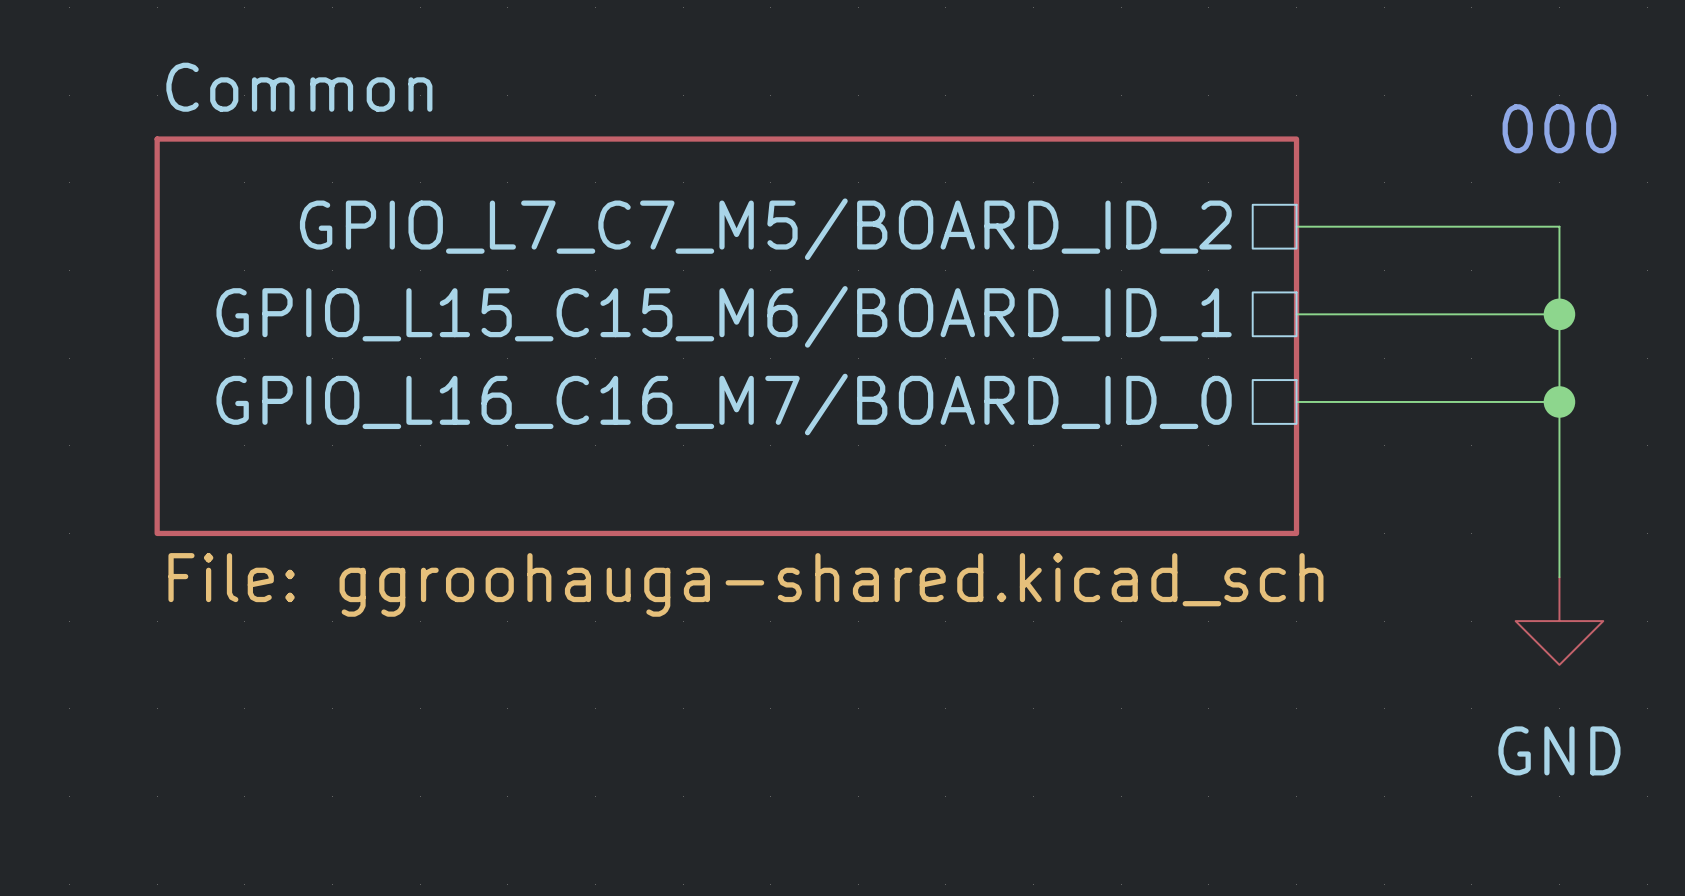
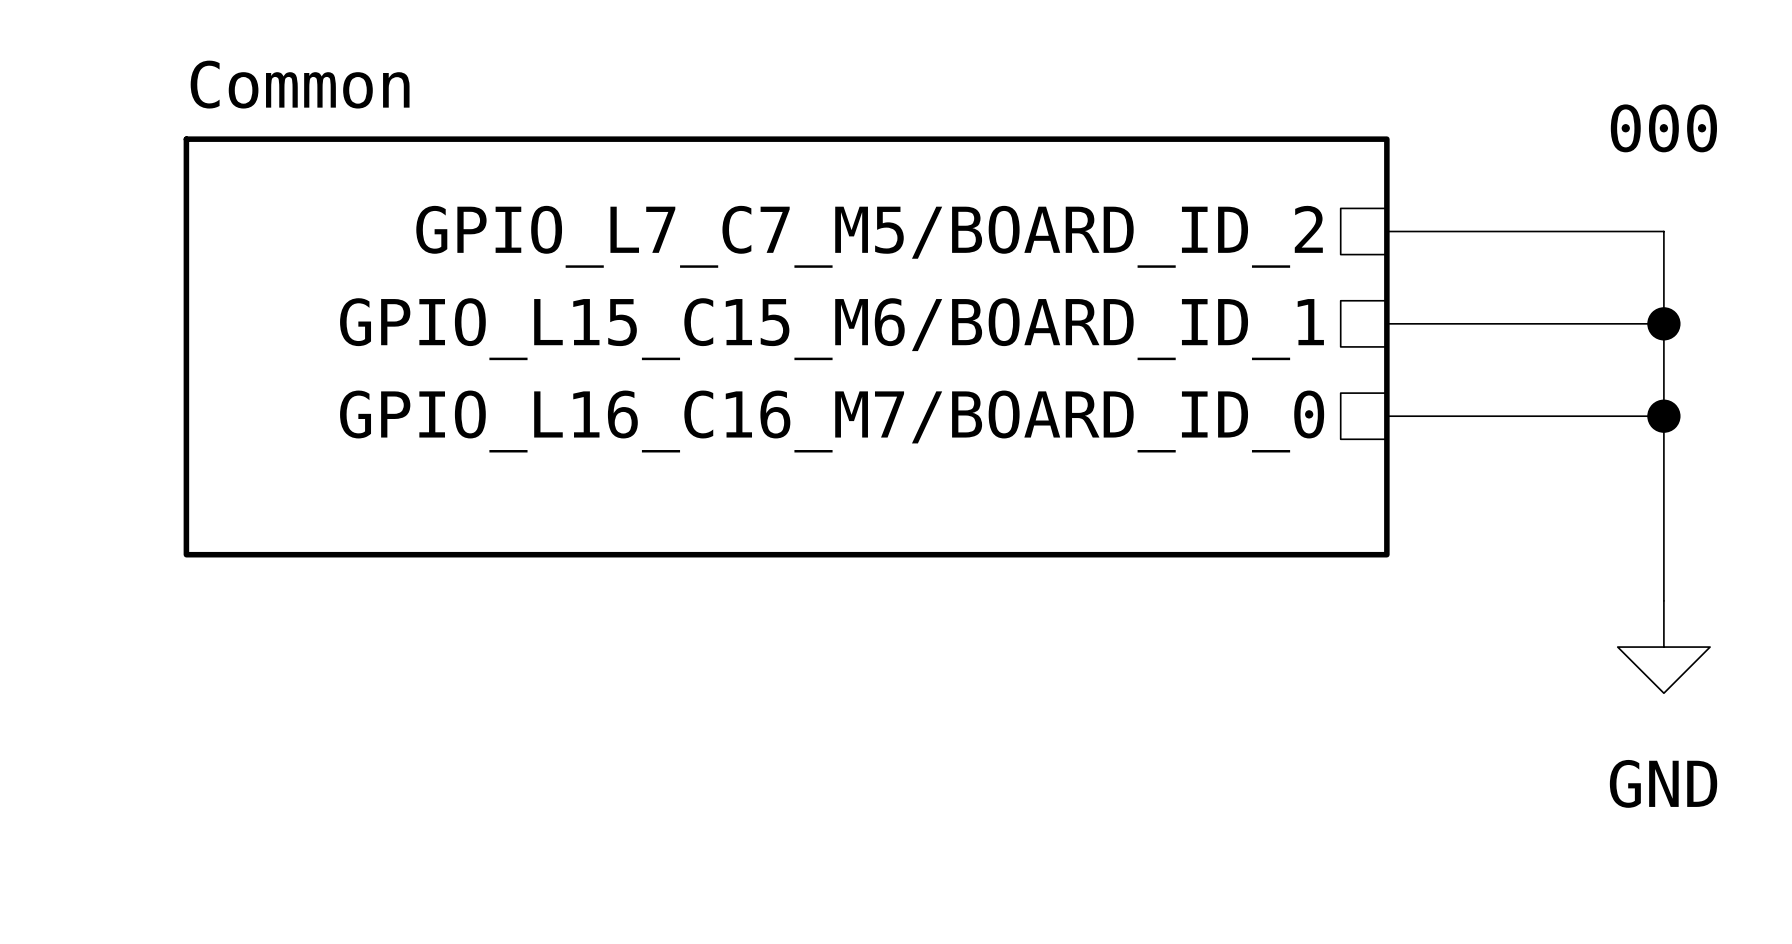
sheet Common value: File: ggroohauga-shared.kicad_sch (745, 584) -> none

